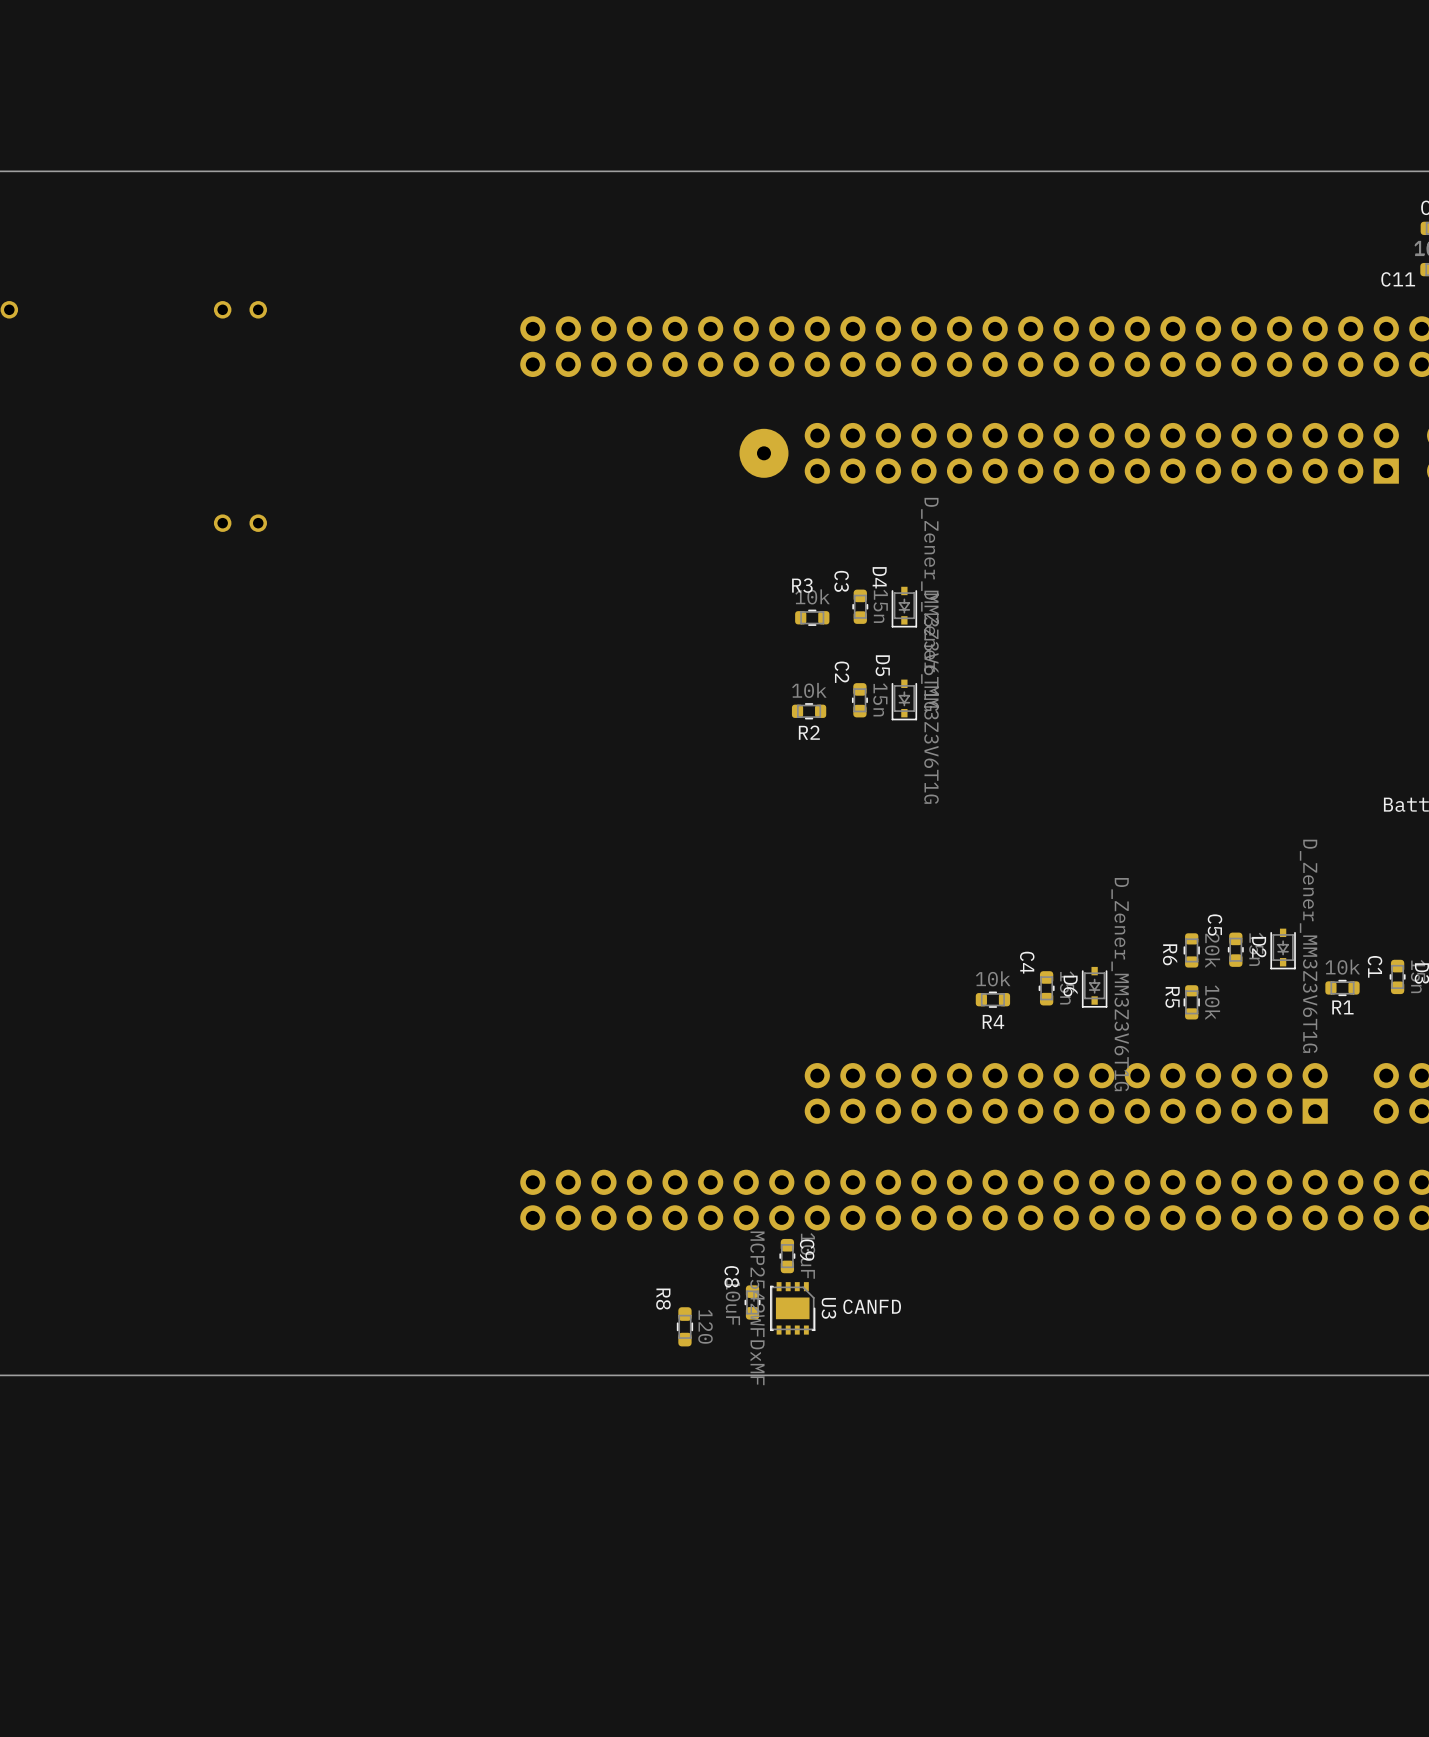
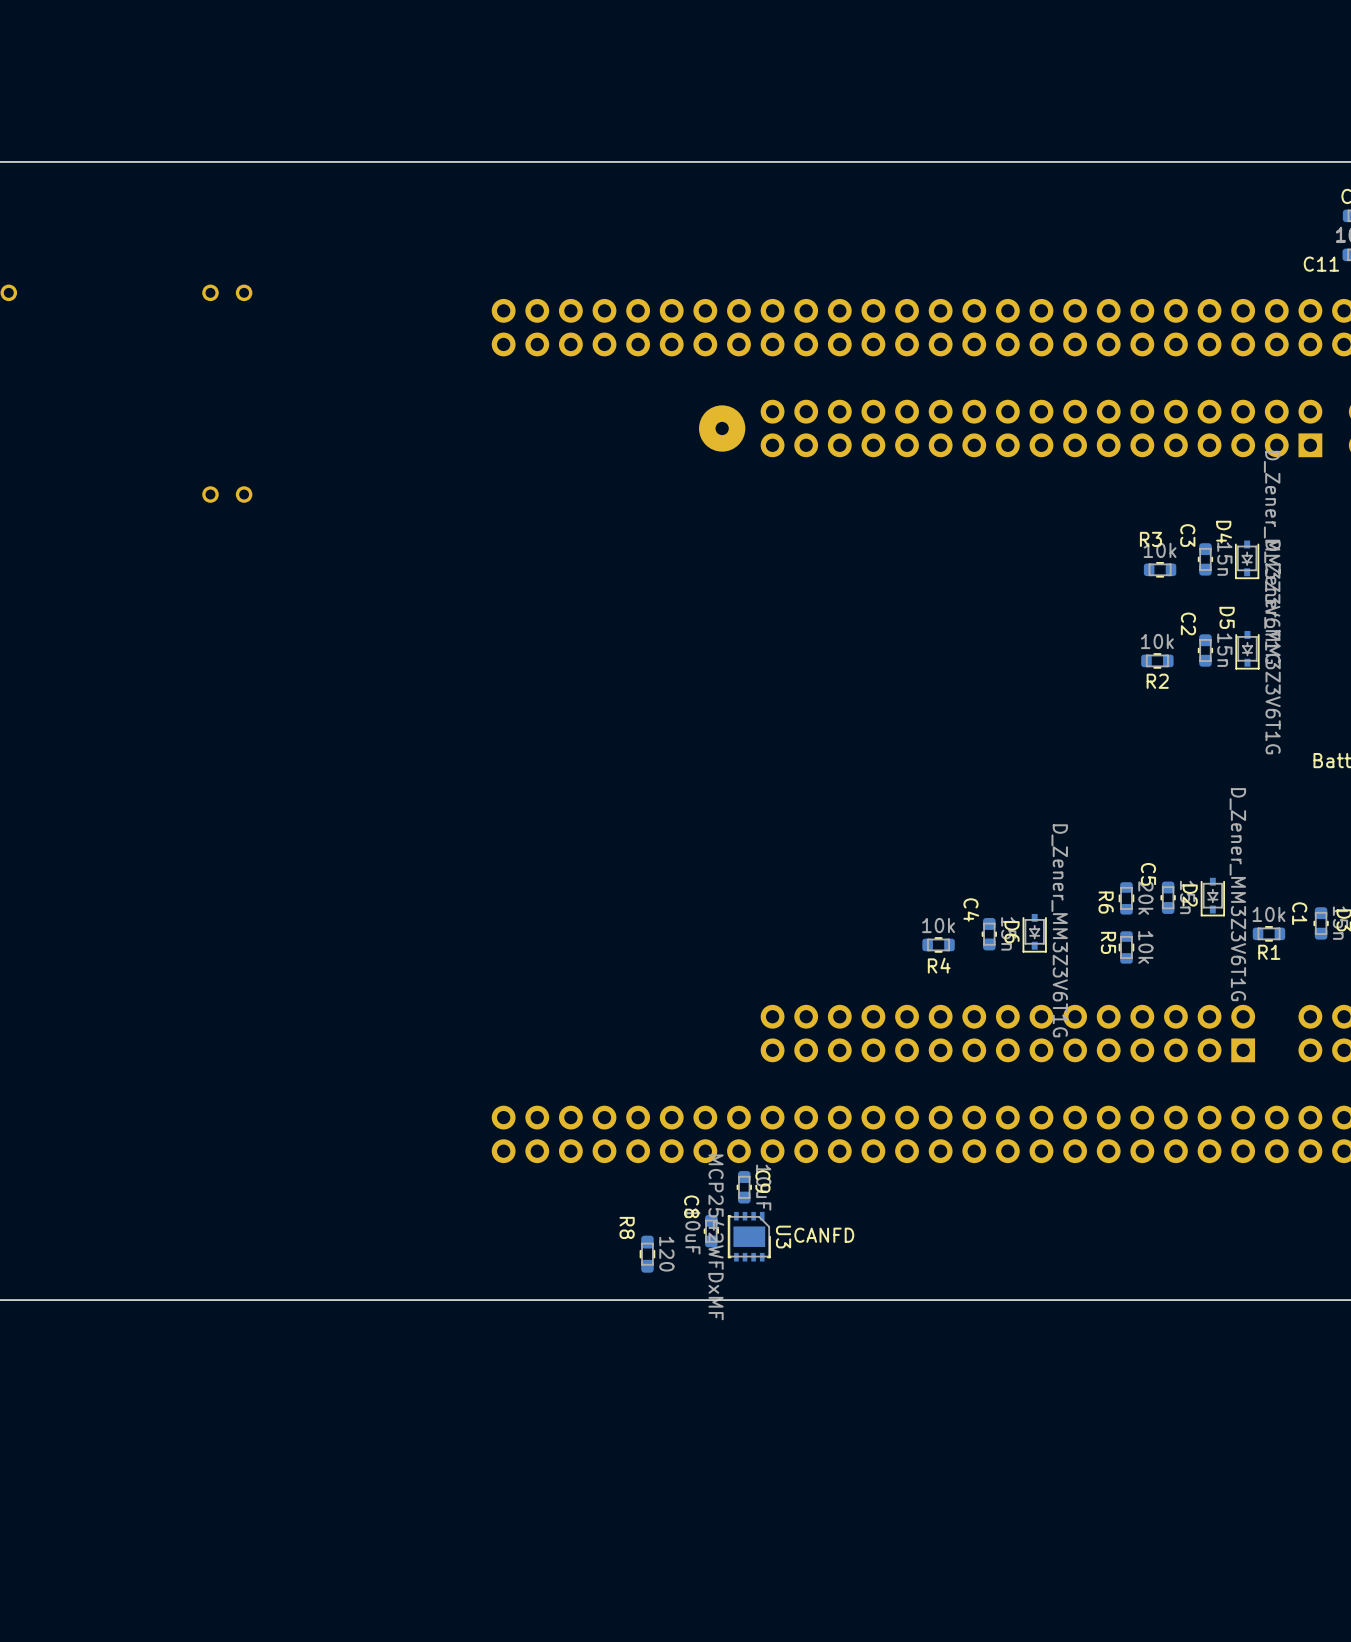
C3 position: (860, 606) -> (1205, 559)
D4 position: (904, 607) -> (1247, 559)
R3 position: (812, 617) -> (1160, 569)
D5 position: (904, 699) -> (1247, 650)
C2 position: (859, 700) -> (1205, 650)
R2 position: (809, 711) -> (1157, 660)

